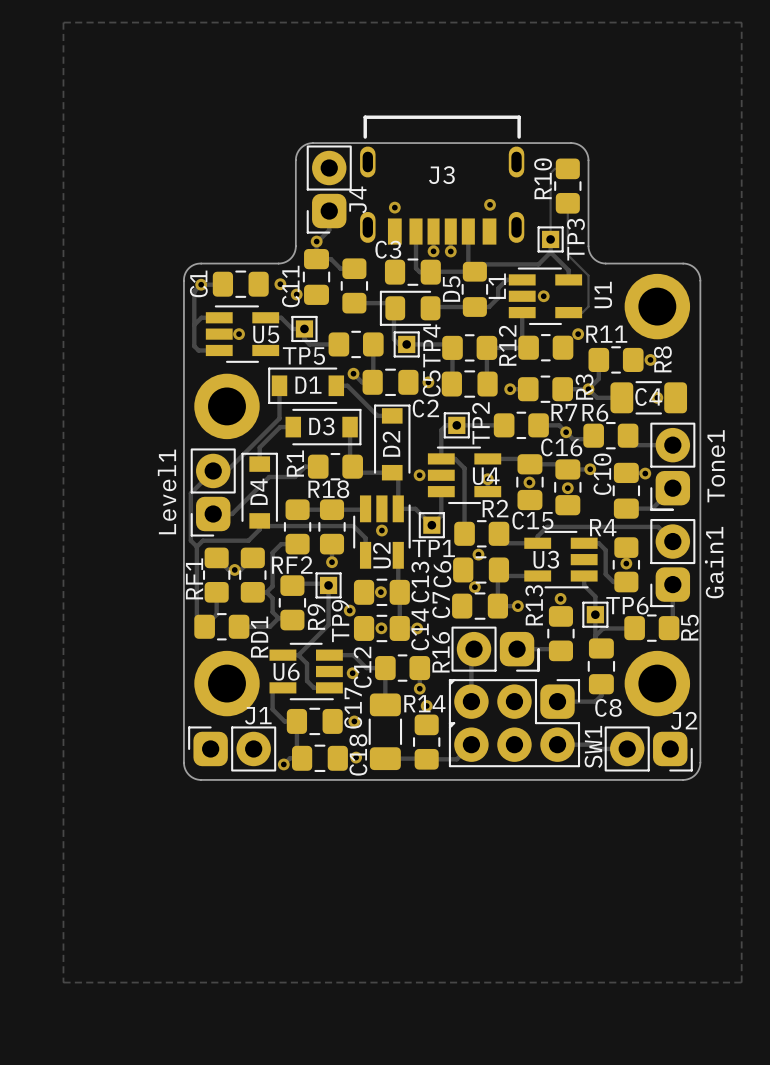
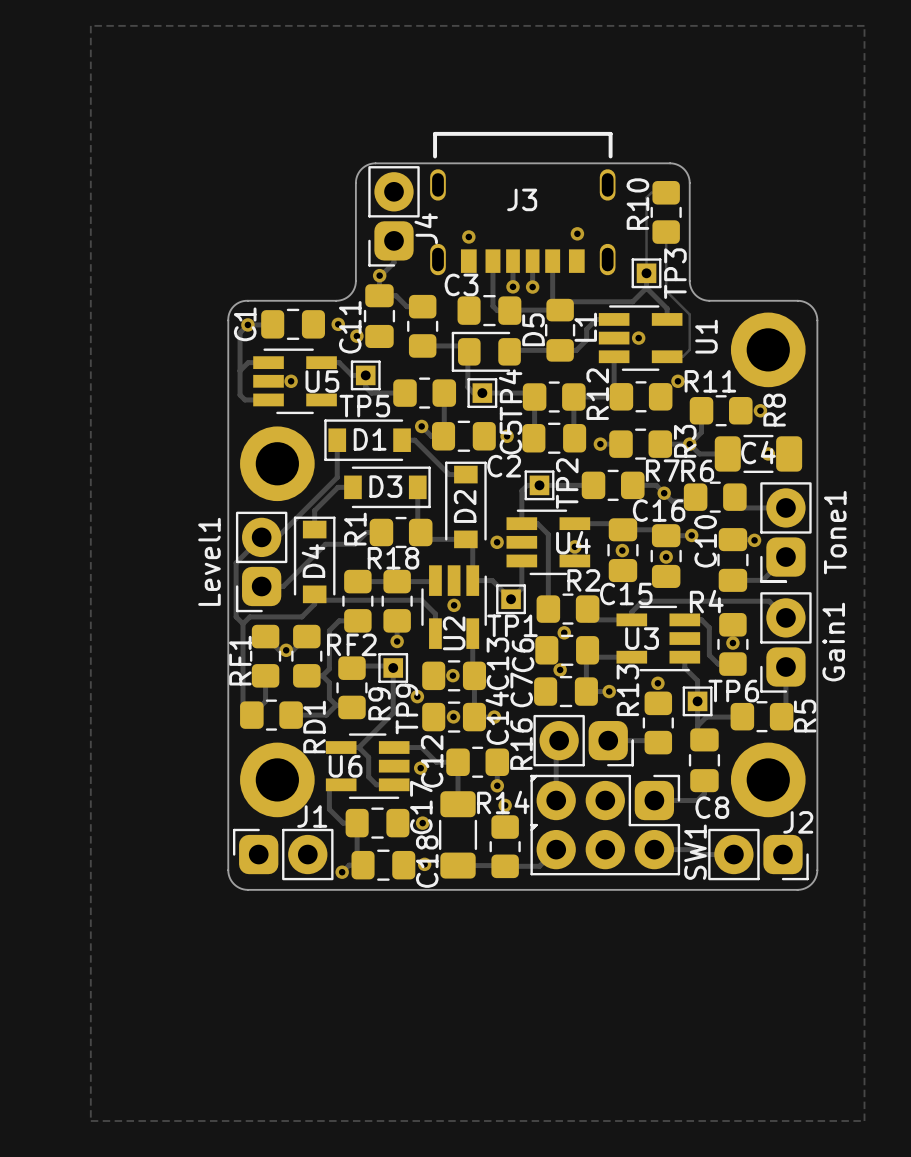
J3 footprint: [360, 115, 525, 245] -> [430, 131, 616, 276]

